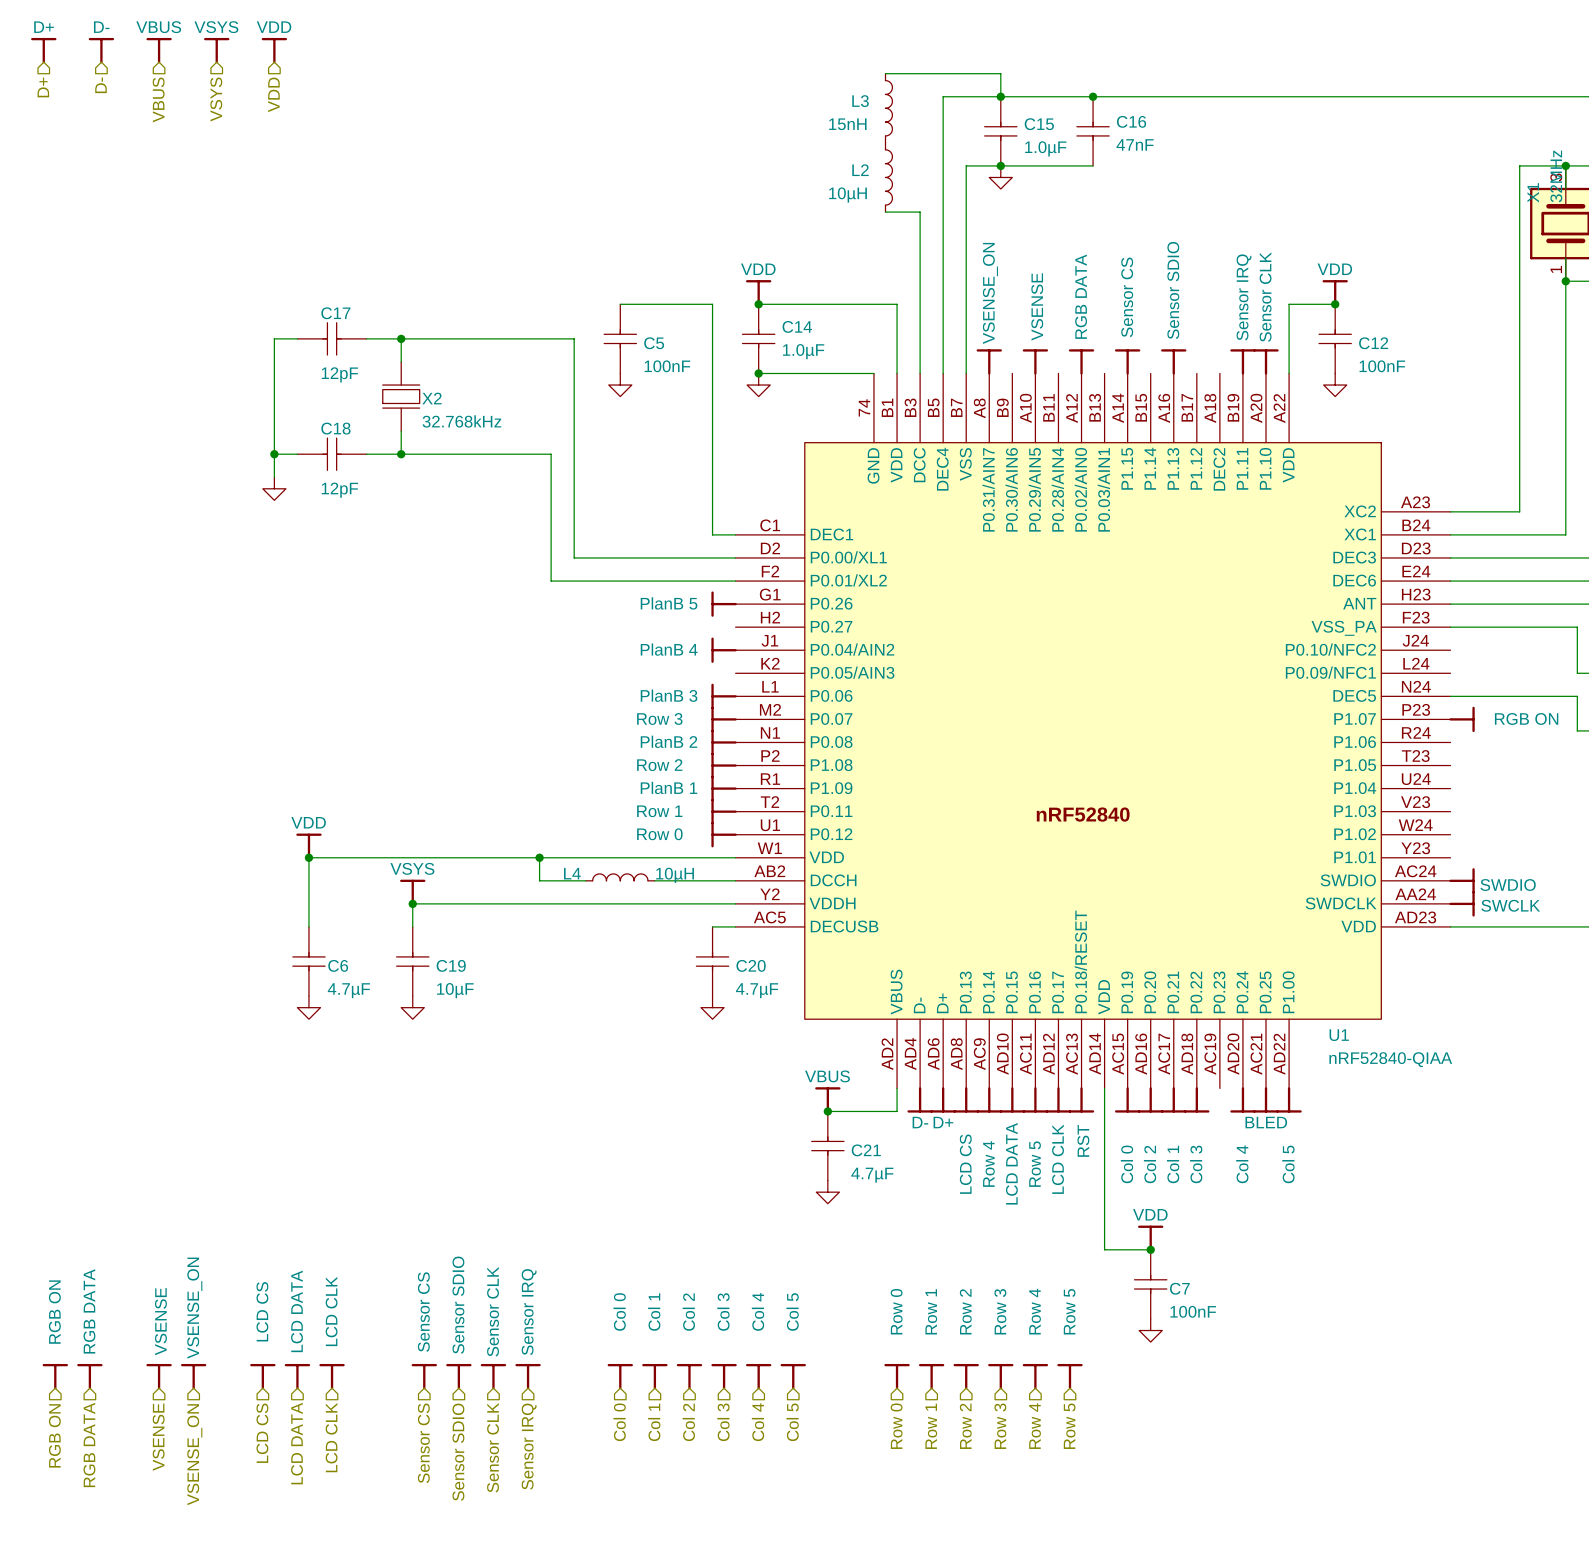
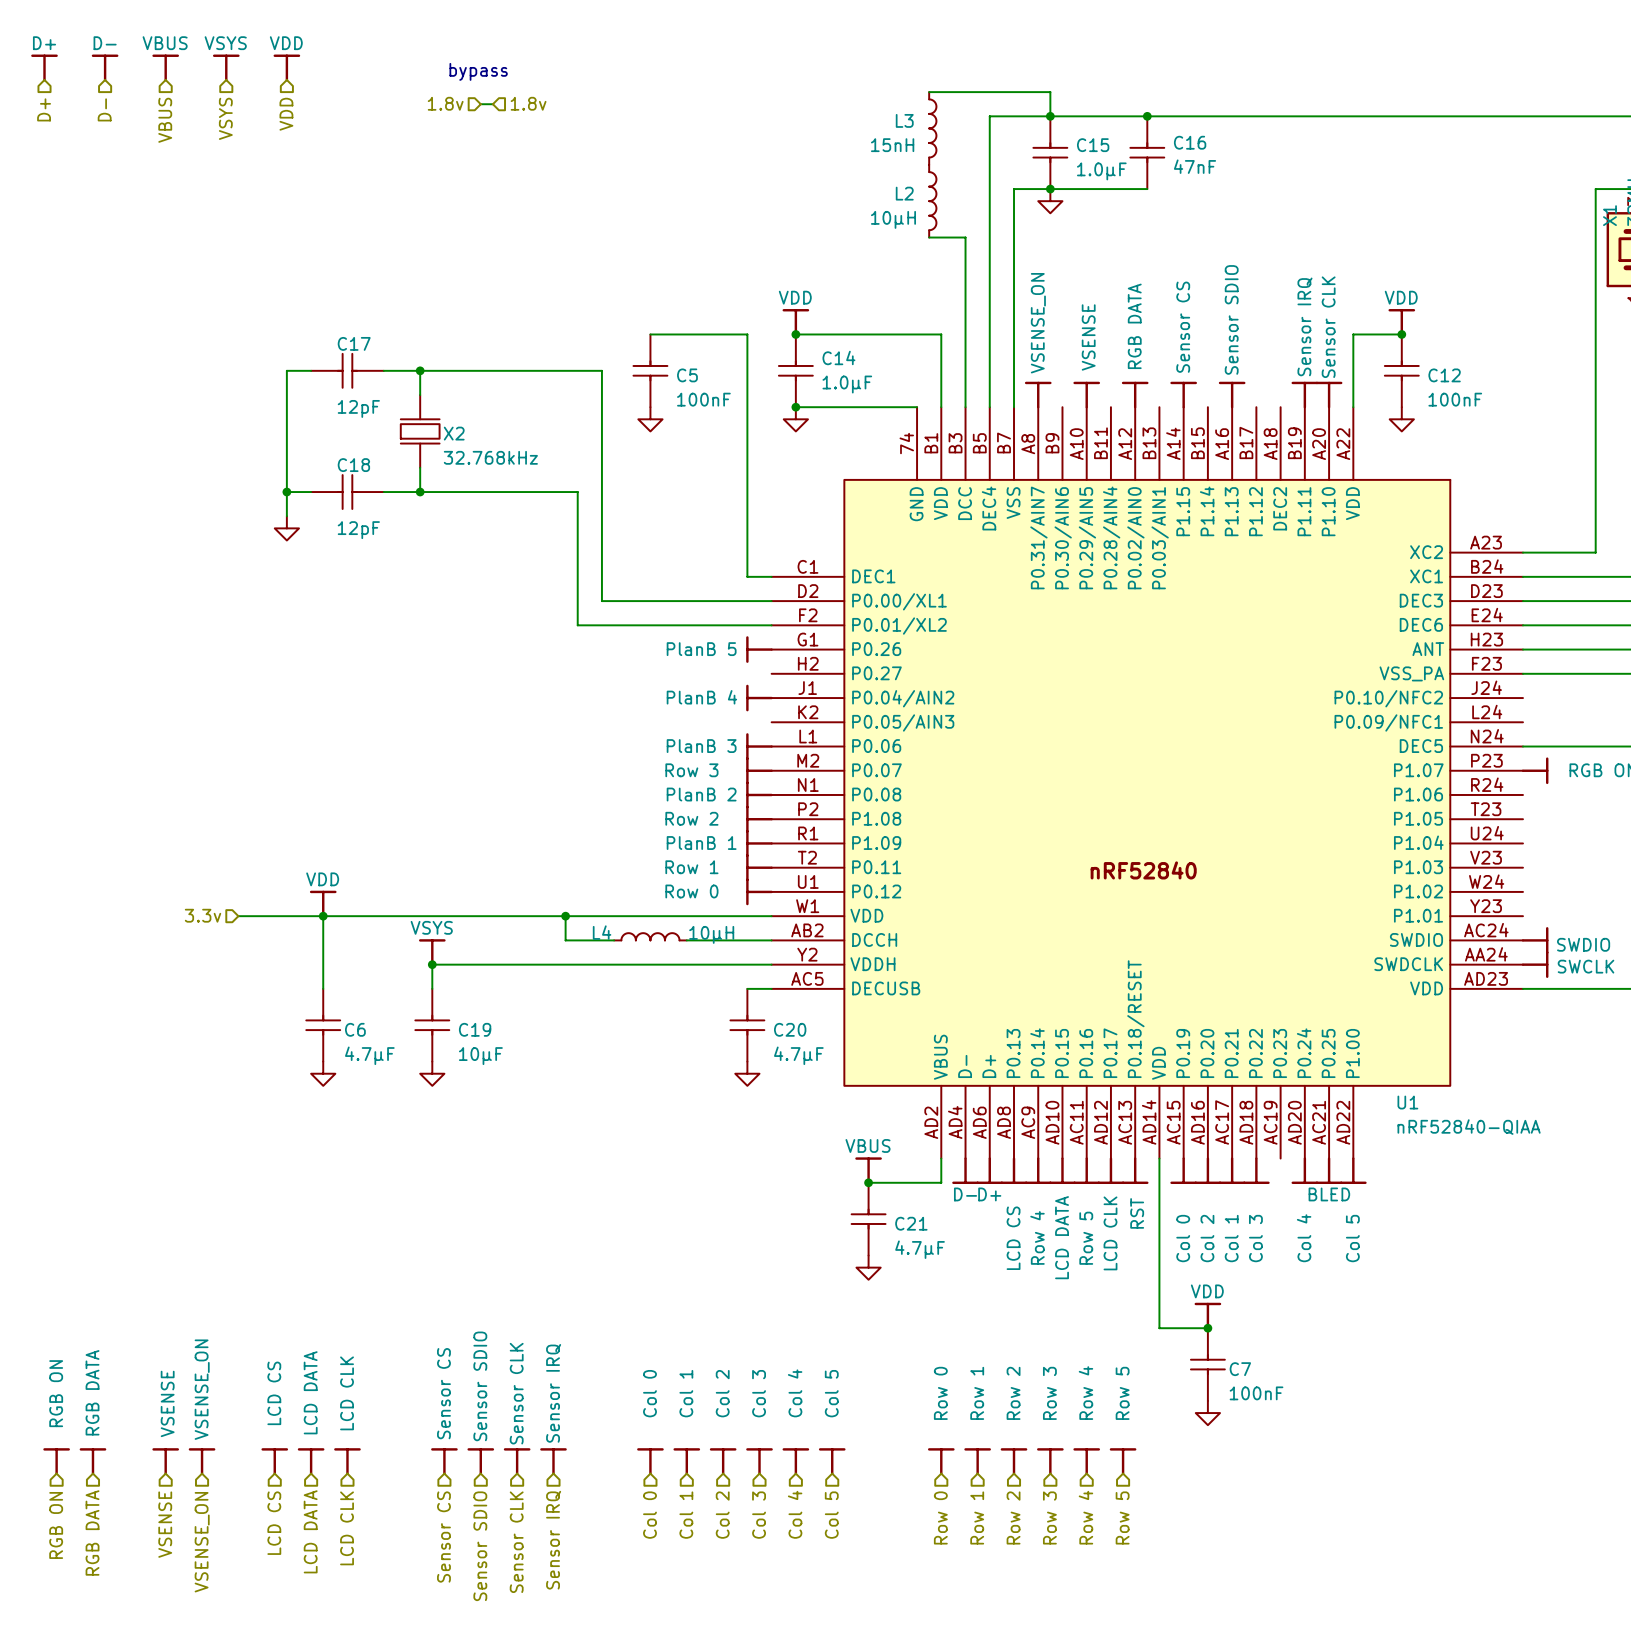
text: none -> bypass (478, 71)
hierarchical label: none -> 1.8v (445, 103)
hierarchical label: none -> 1.8v (528, 103)
wire: none -> (480, 104) (492, 104)
hierarchical label: none -> 3.3v (203, 915)
wire: none -> (238, 916) (323, 916)

